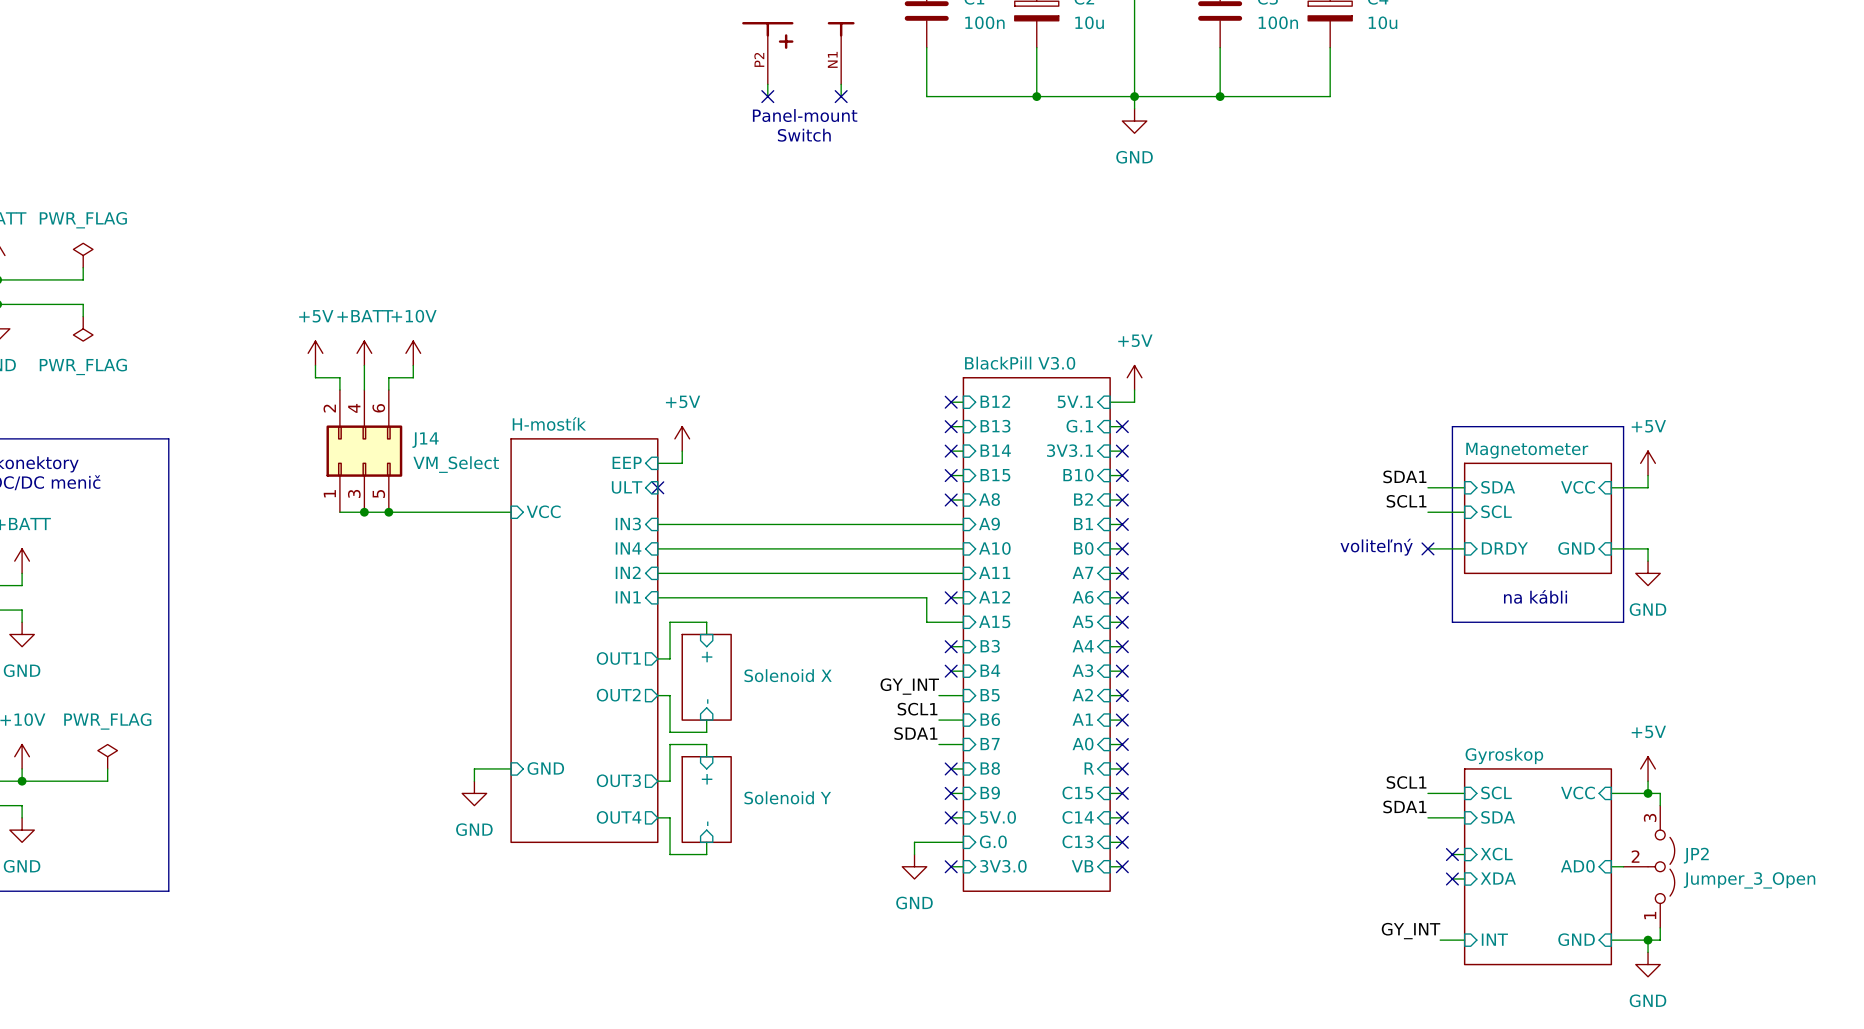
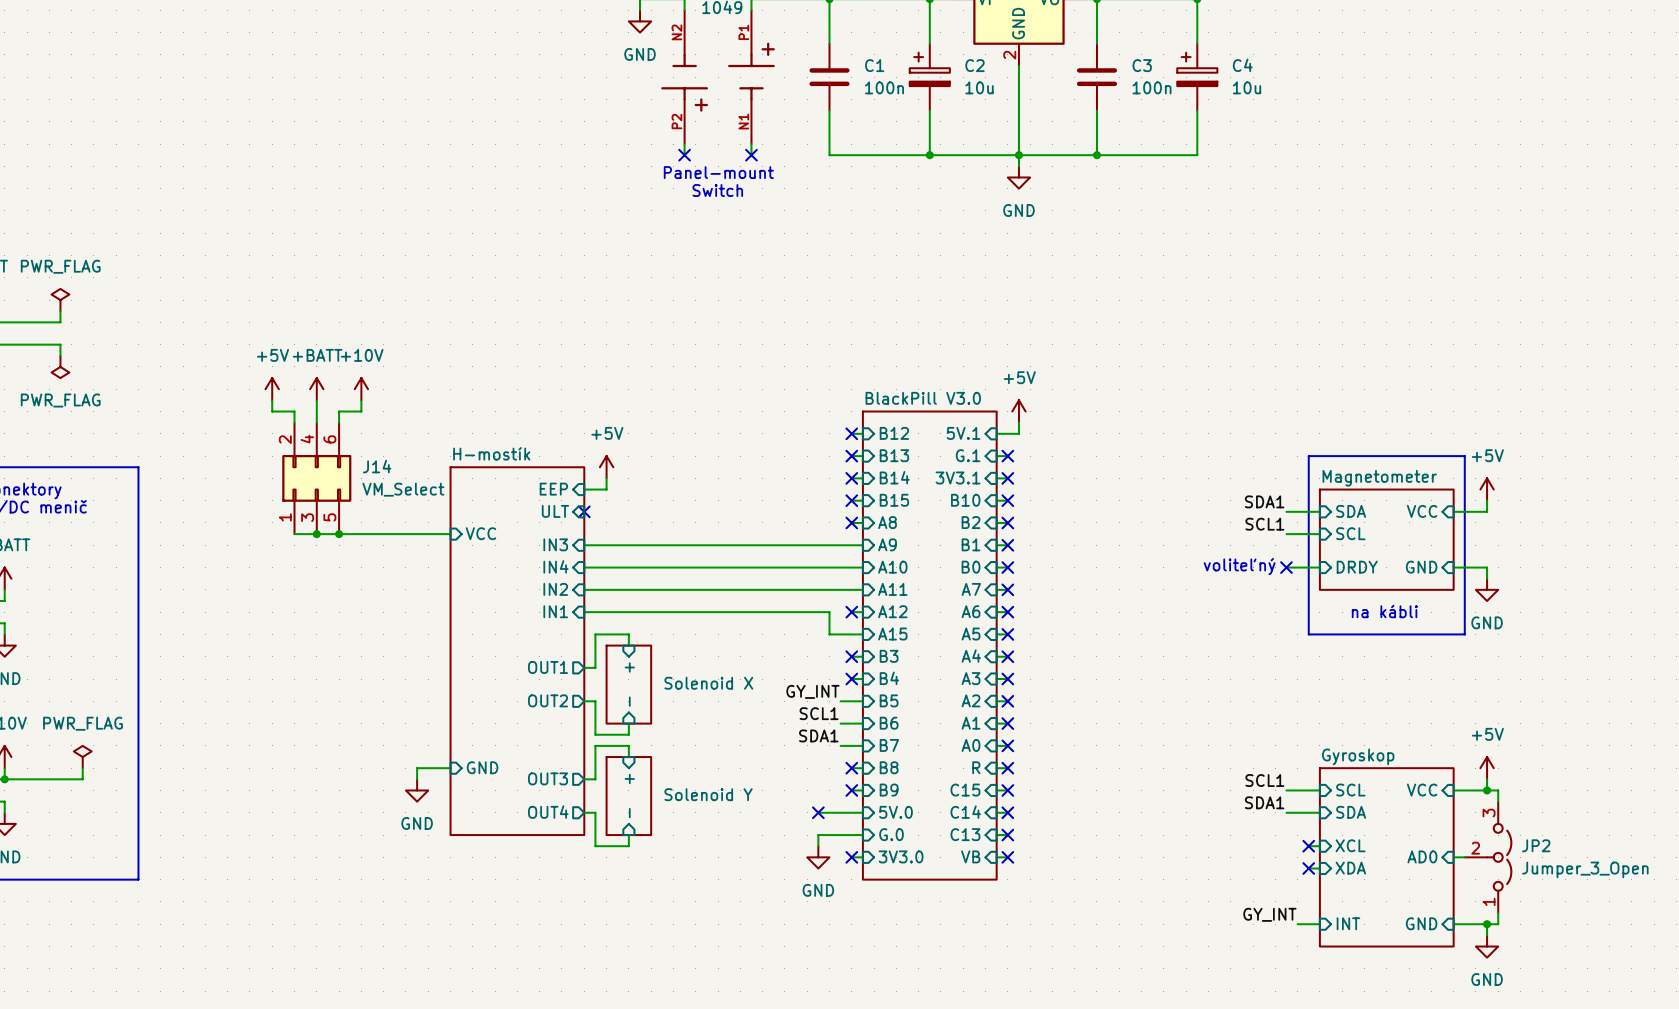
wire: none -> (818, 812) (851, 812)
no-connect mark position: (951, 817) -> (818, 812)

